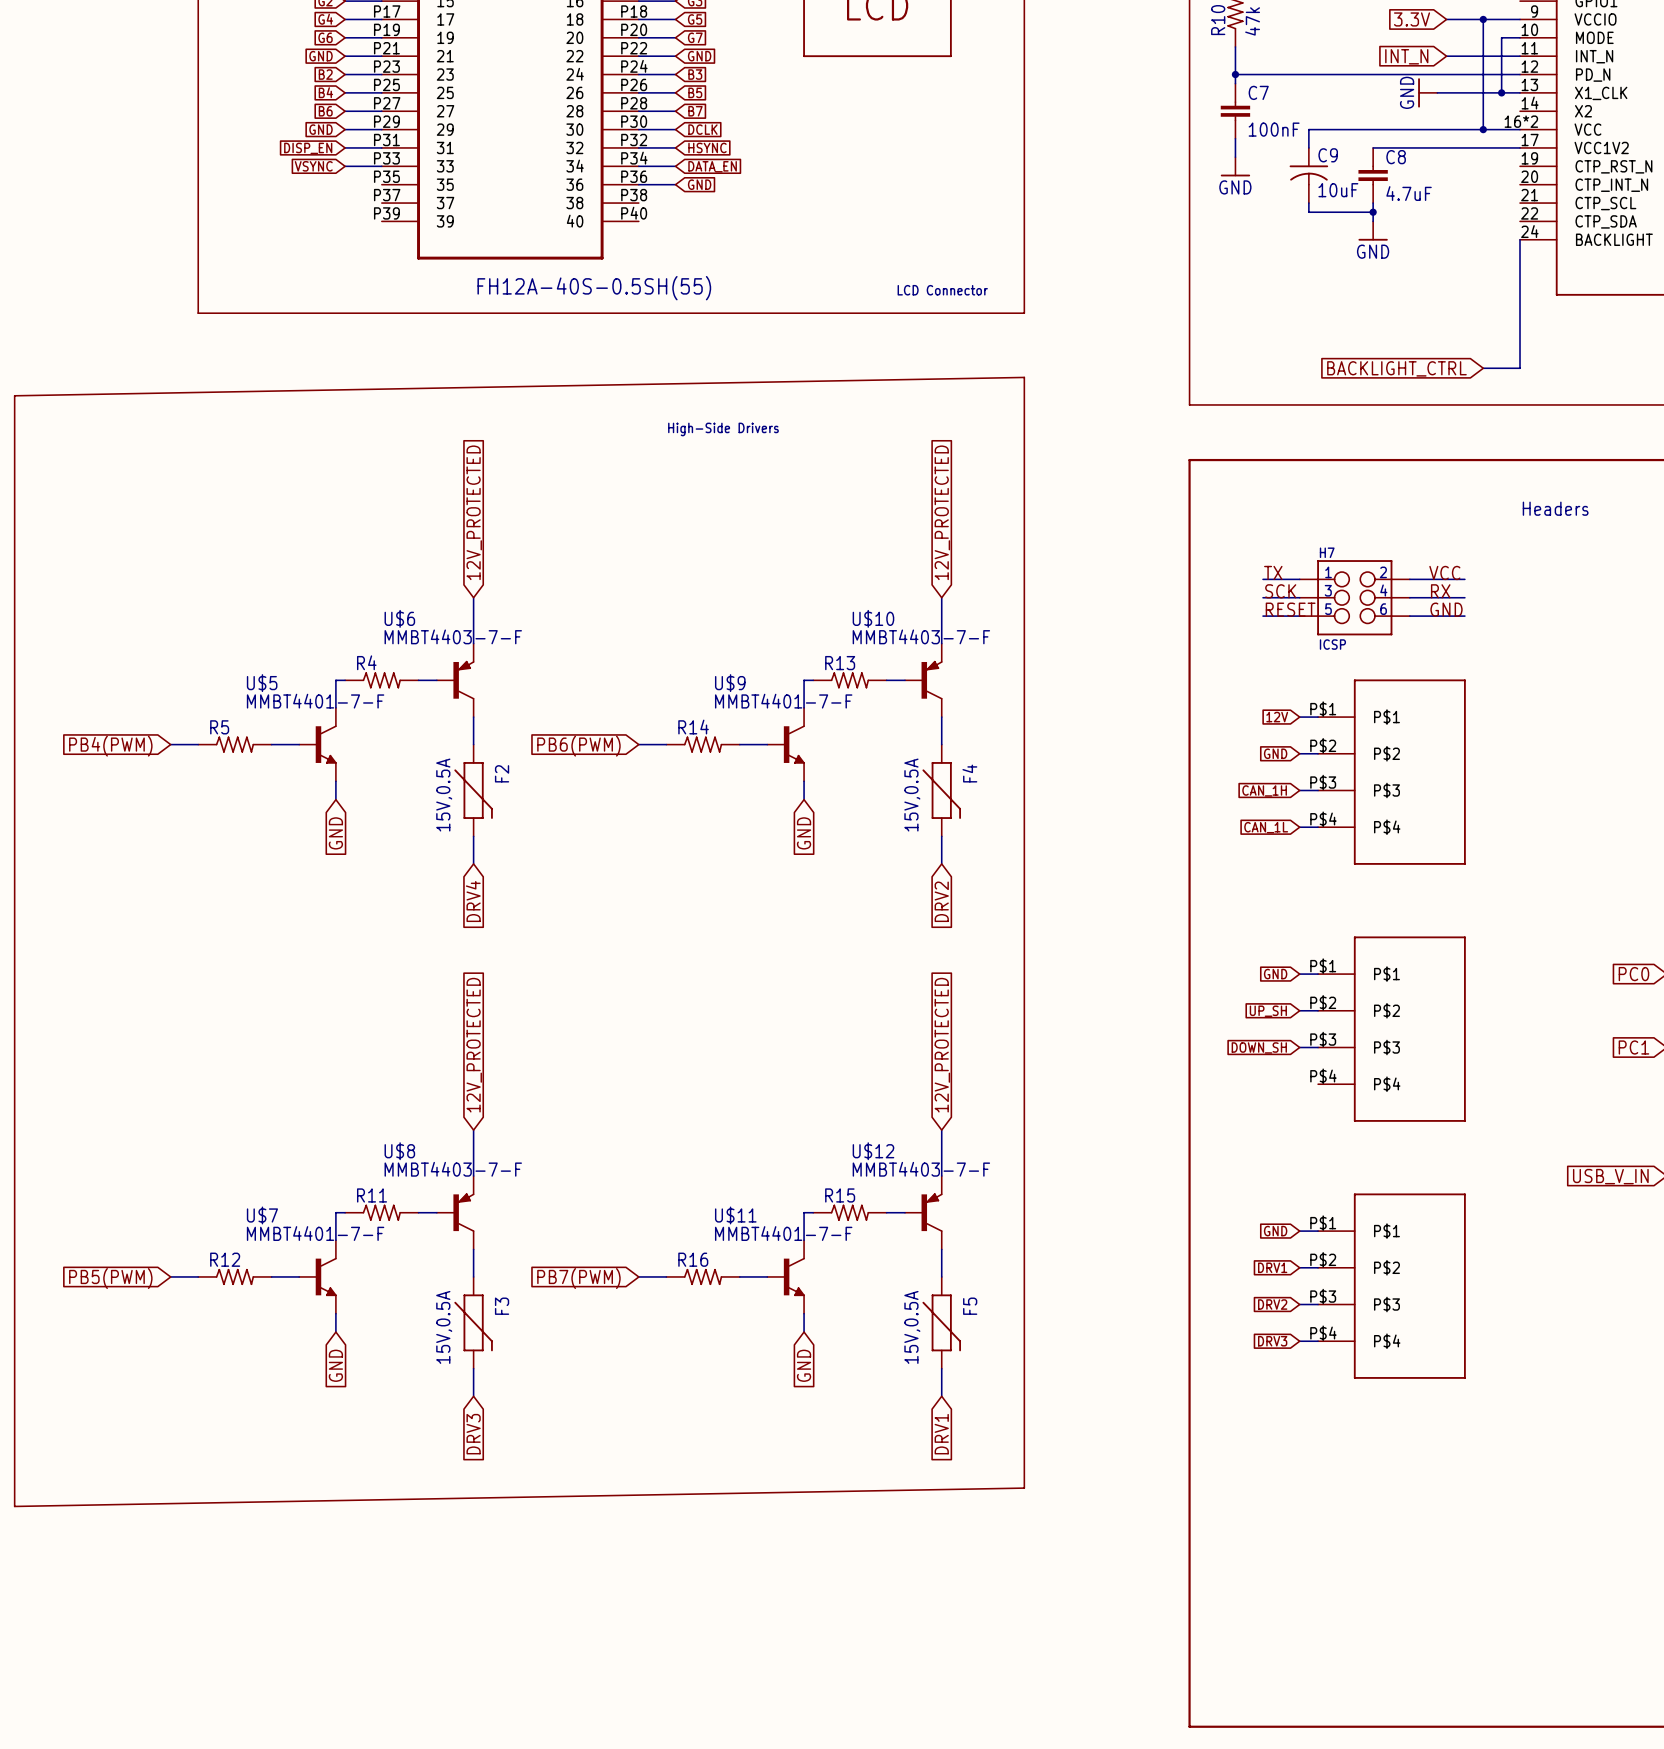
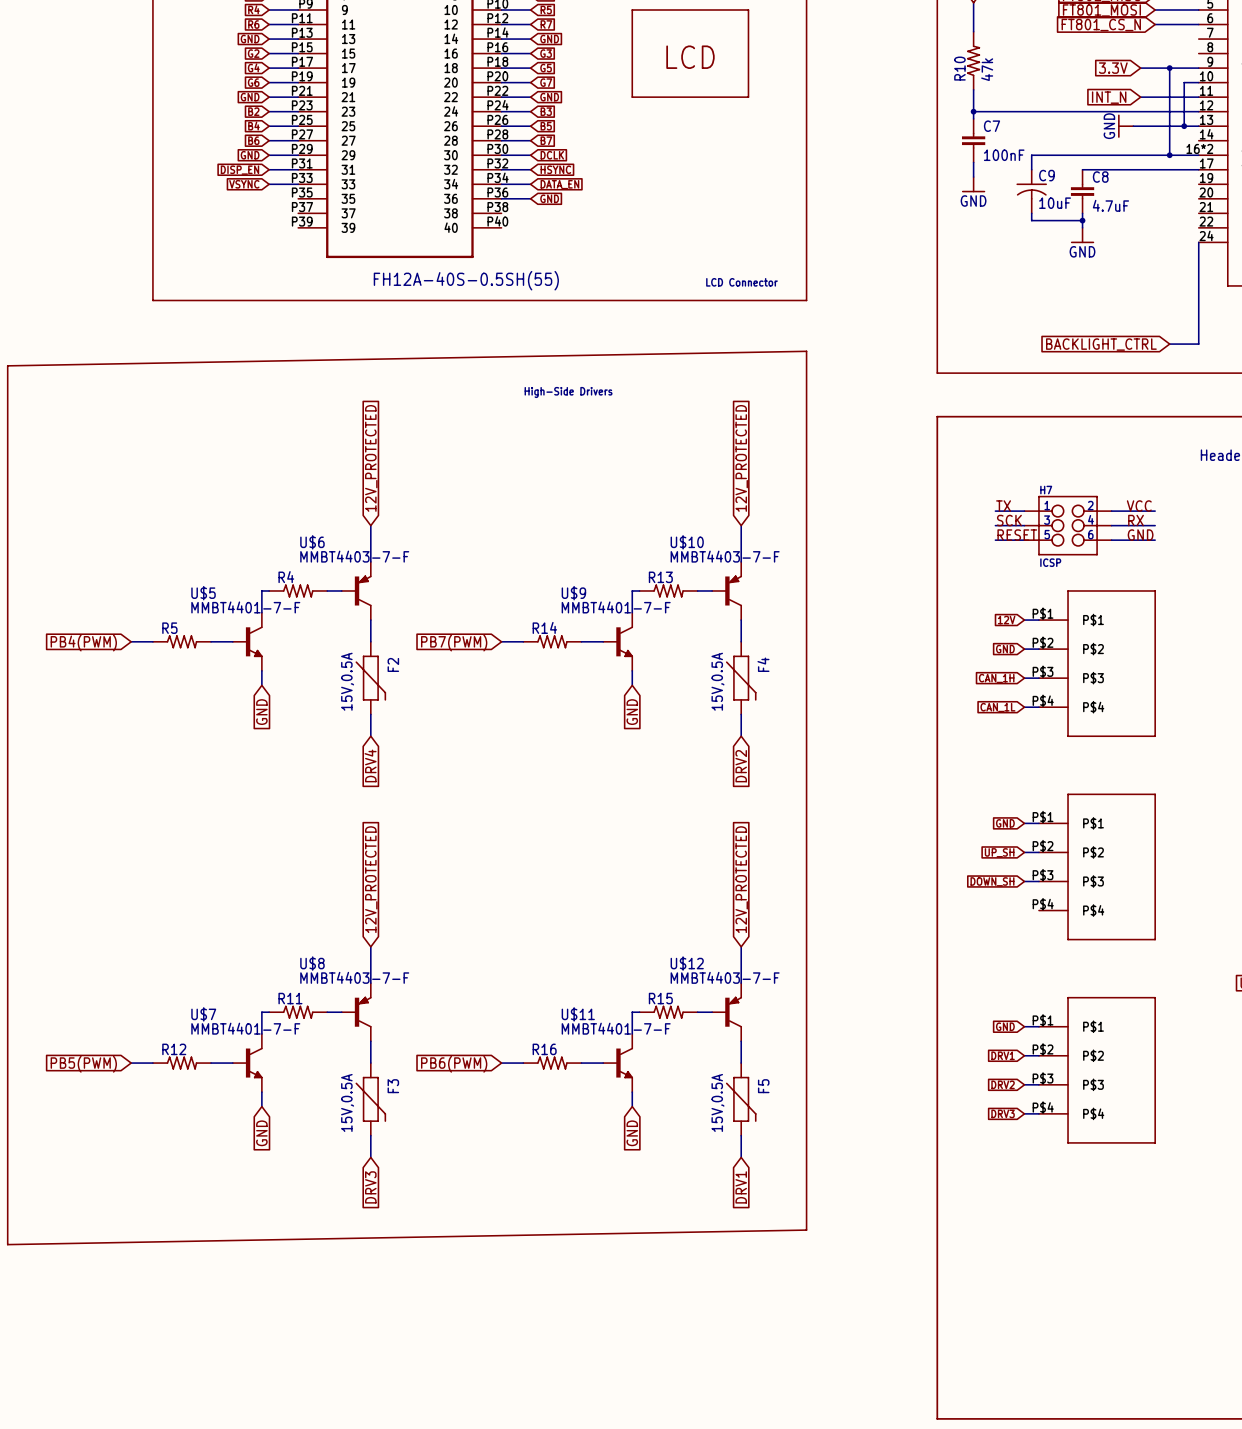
global label: PB6(PWM) (578, 746) -> PB7(PWM) (454, 643)
global label: PB7(PWM) (578, 1278) -> PB6(PWM) (454, 1064)

